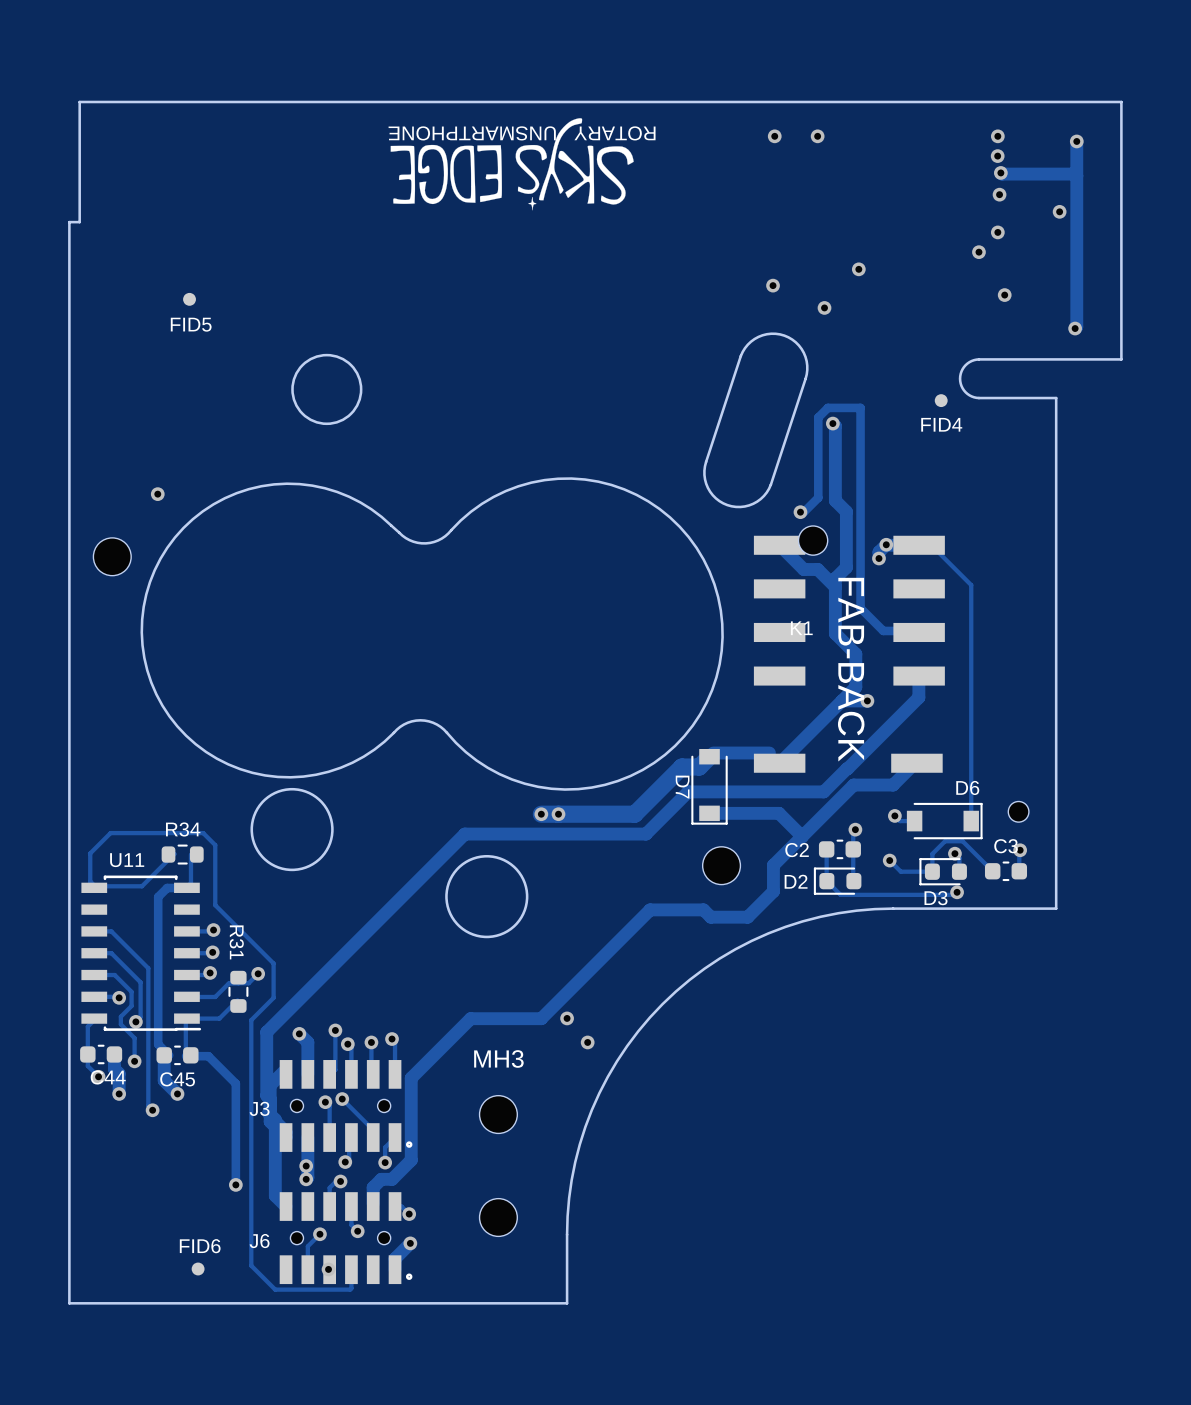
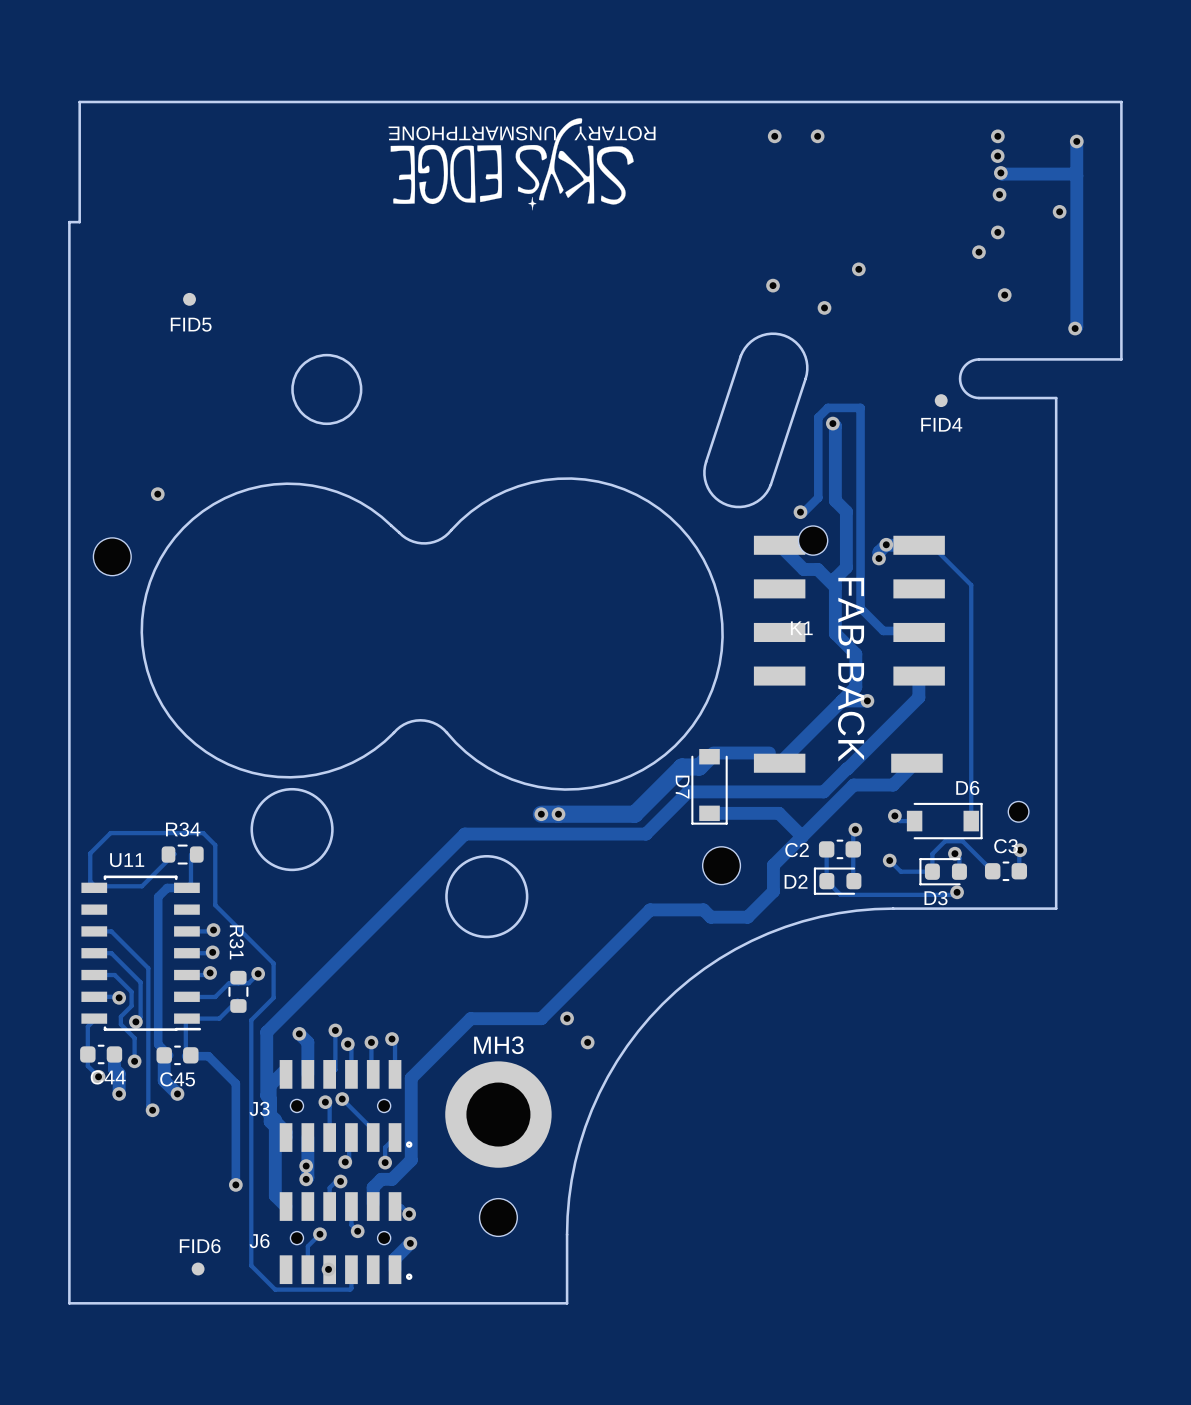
MH3 footprint: [479, 1095, 518, 1134] -> [445, 1061, 552, 1168]

